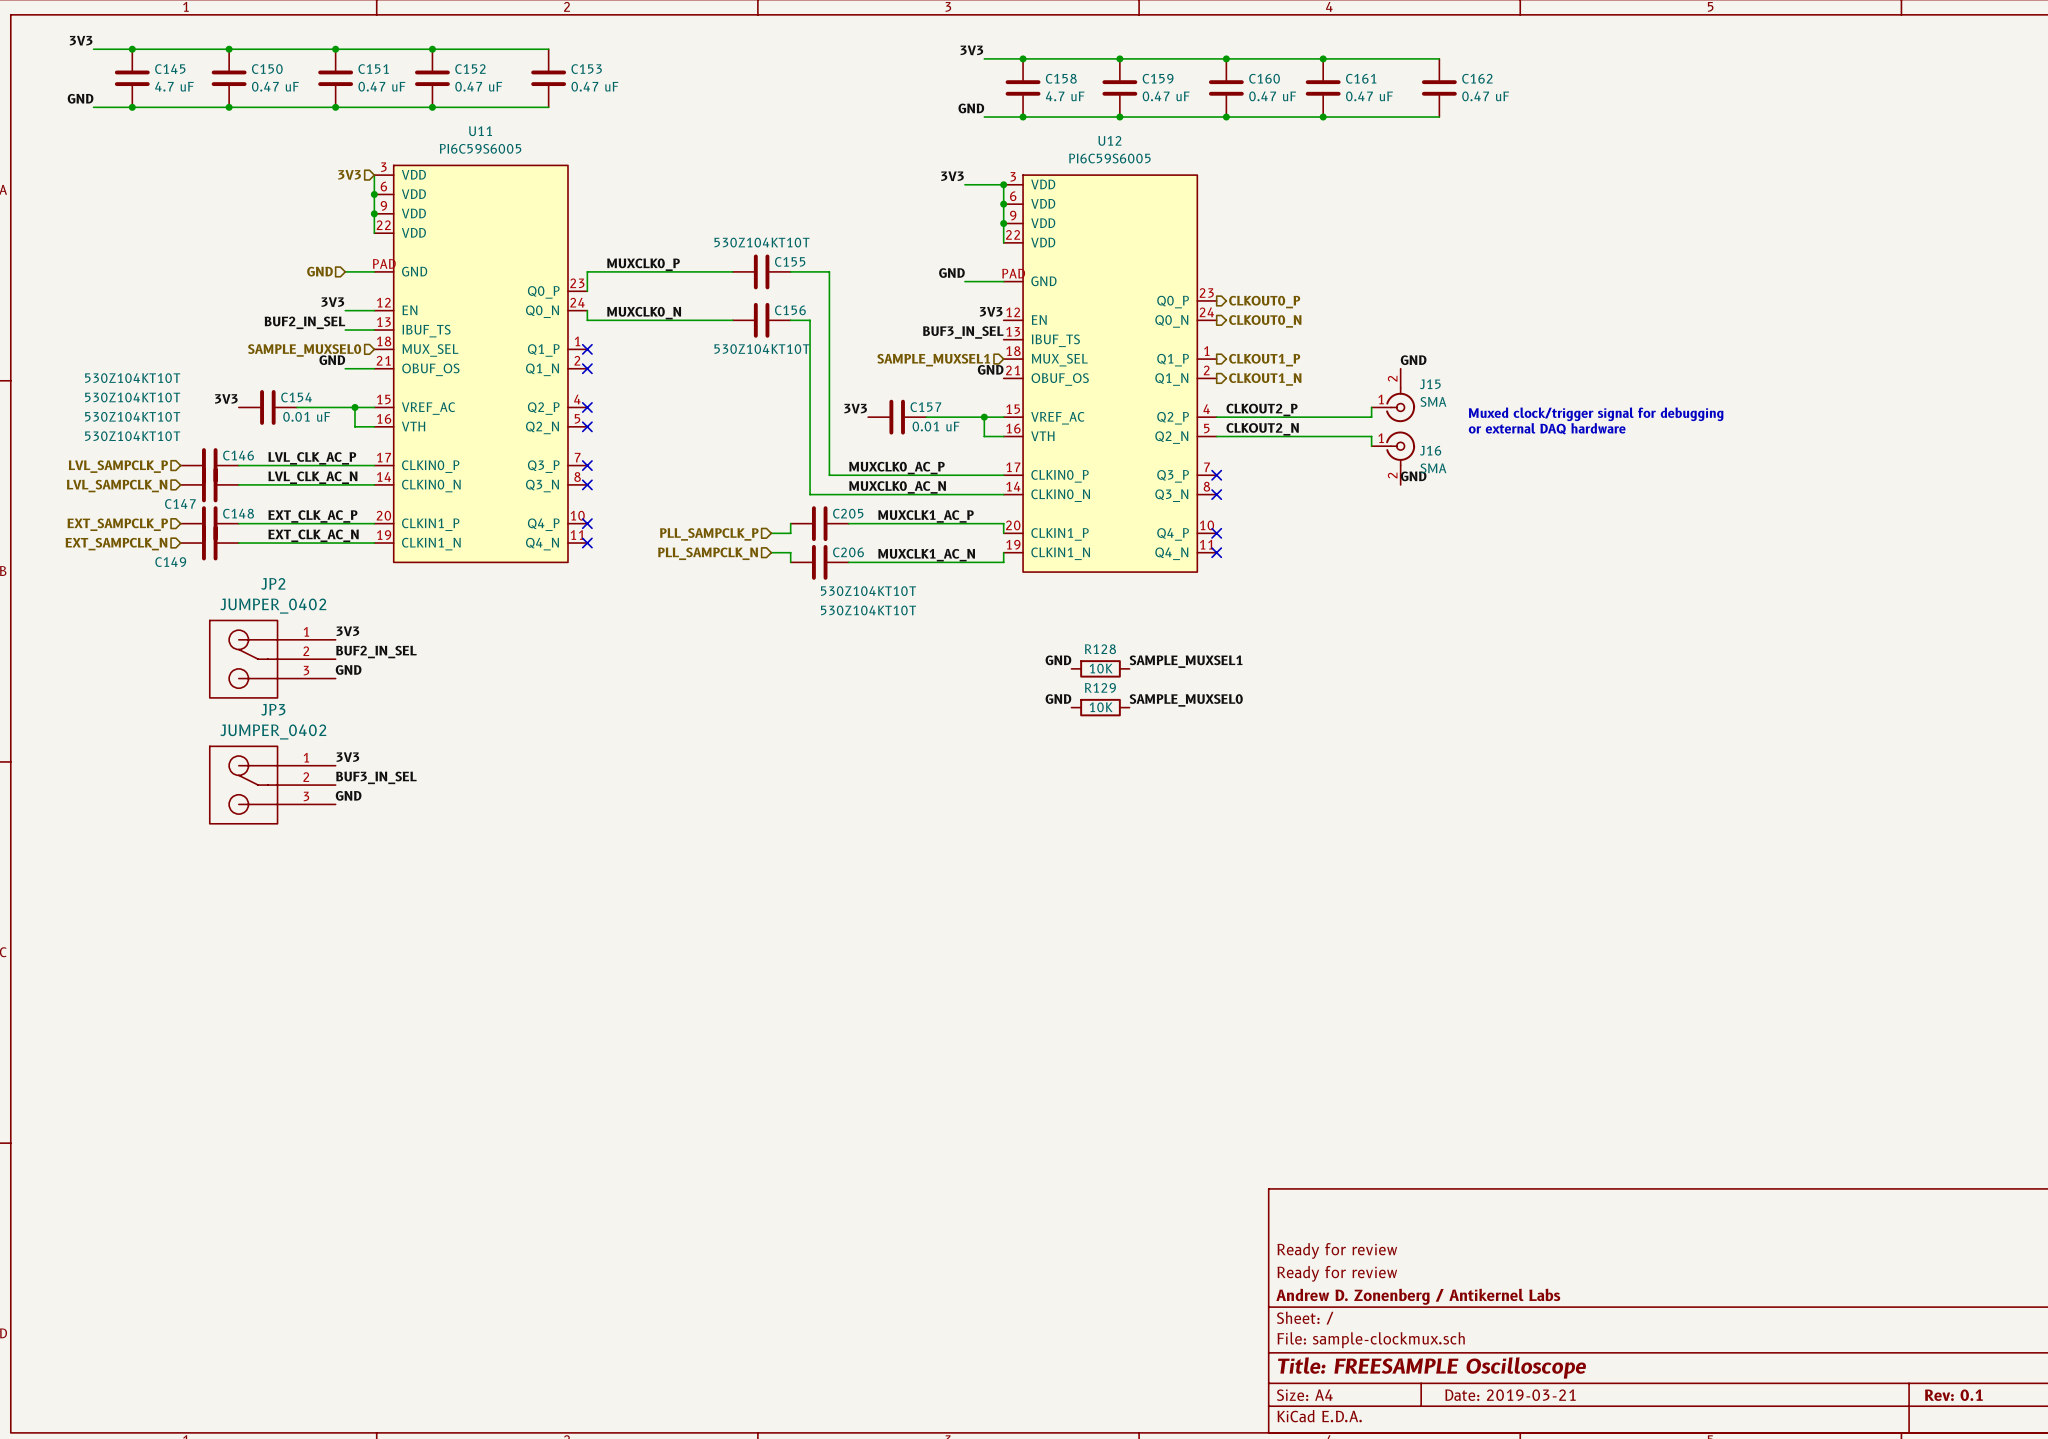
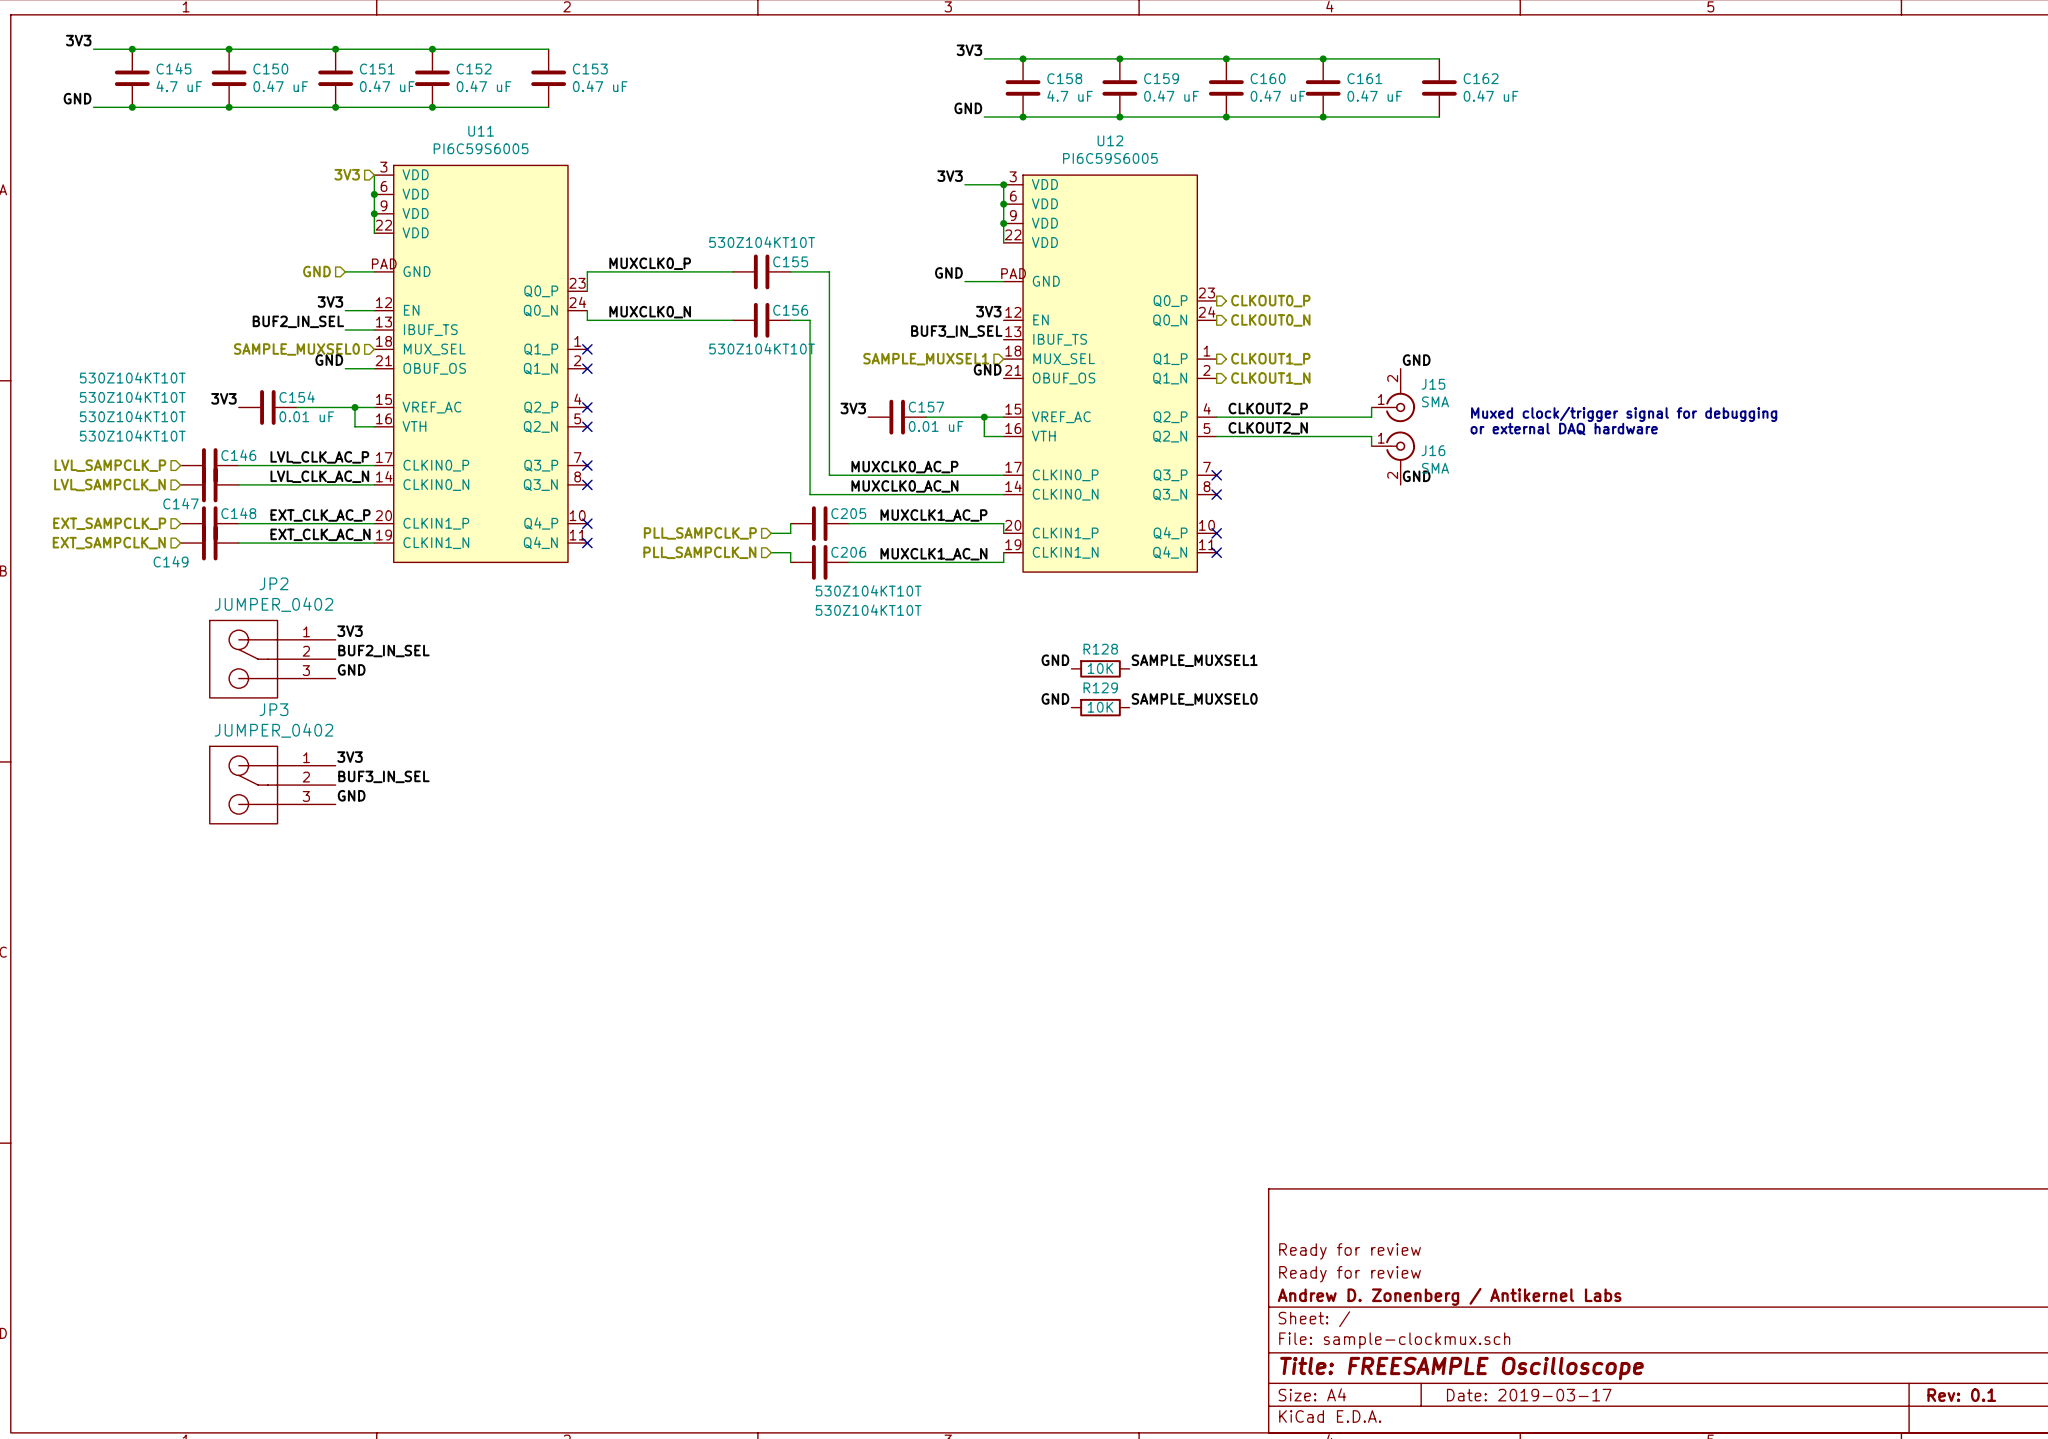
title block: Date: 2019-03-21 (1510, 1395) -> Date: 2019-03-17 (1529, 1395)

